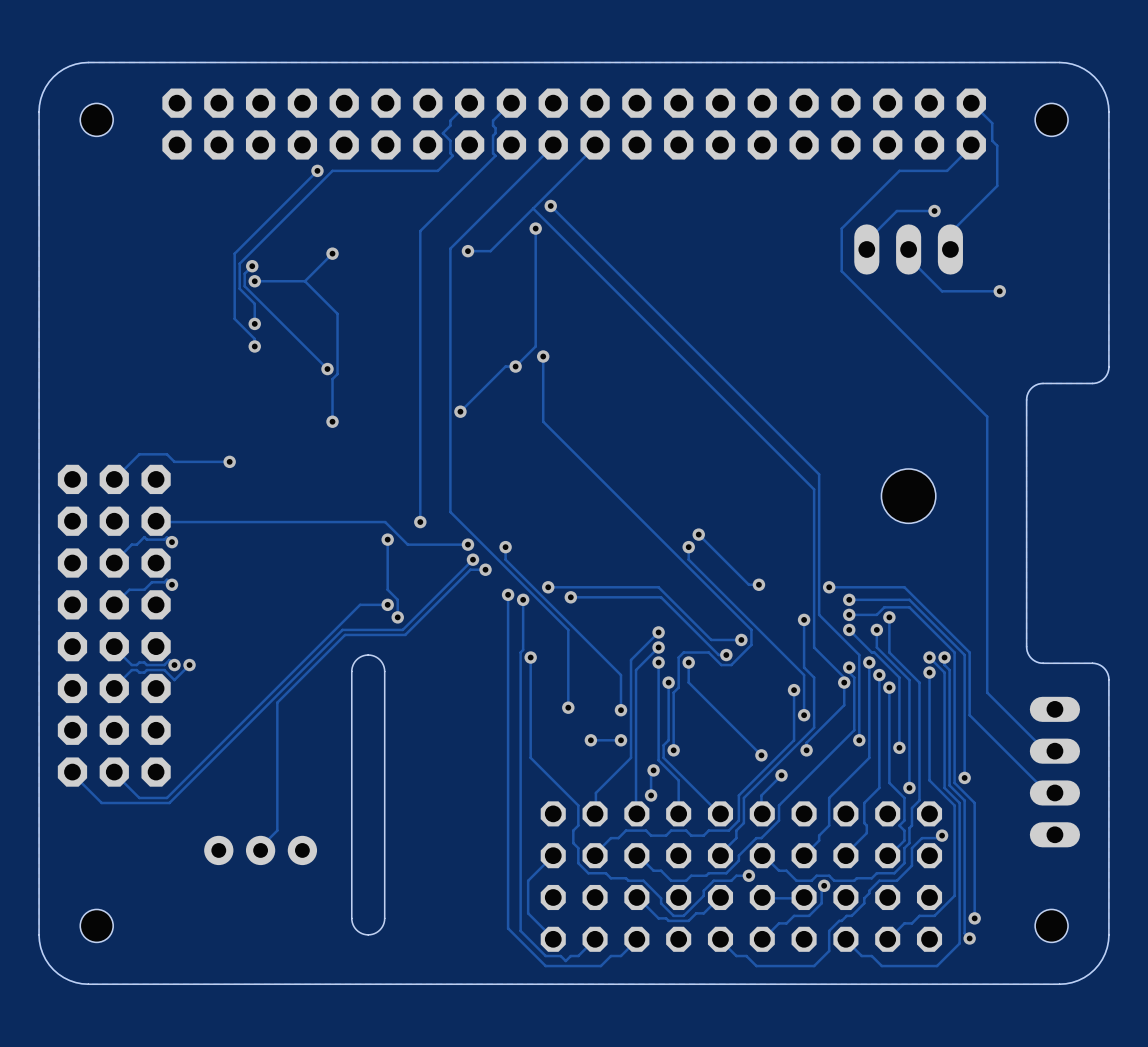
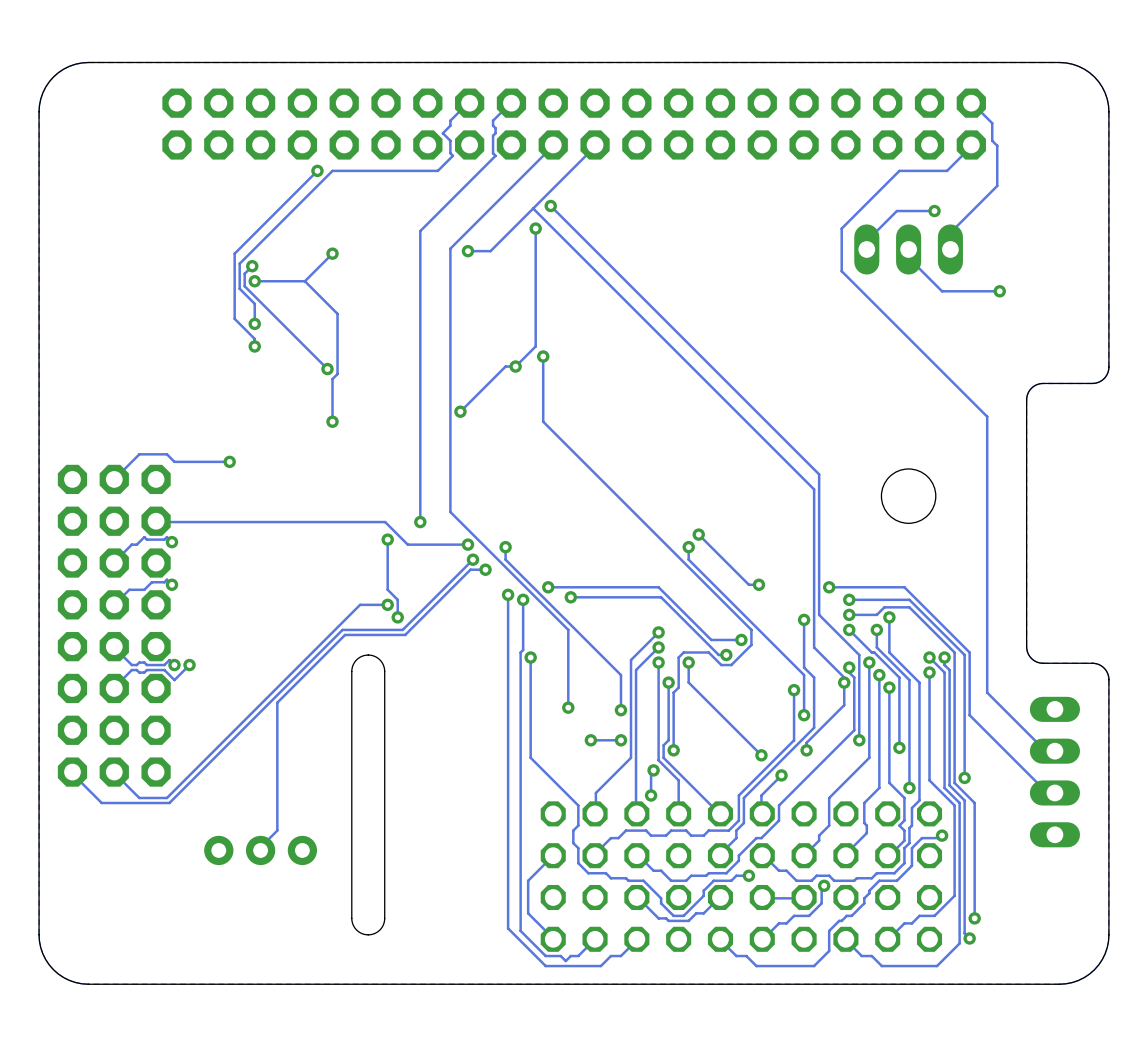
hole: (96, 119) -> none
hole: (1051, 119) -> none
hole: (96, 925) -> none
hole: (1051, 925) -> none

